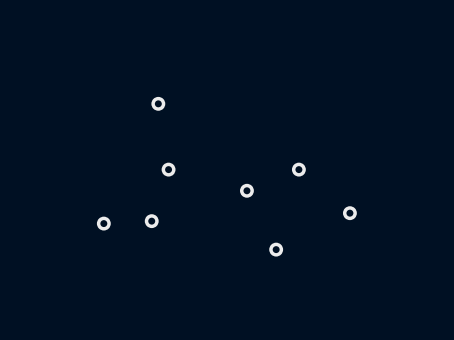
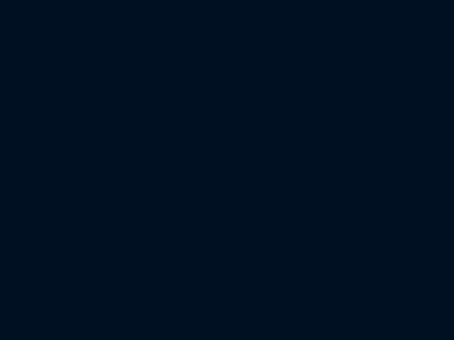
via: (158, 103) -> none
via: (168, 169) -> none
via: (298, 169) -> none
via: (246, 190) -> none
via: (349, 213) -> none
via: (151, 221) -> none
via: (103, 223) -> none
via: (276, 249) -> none

